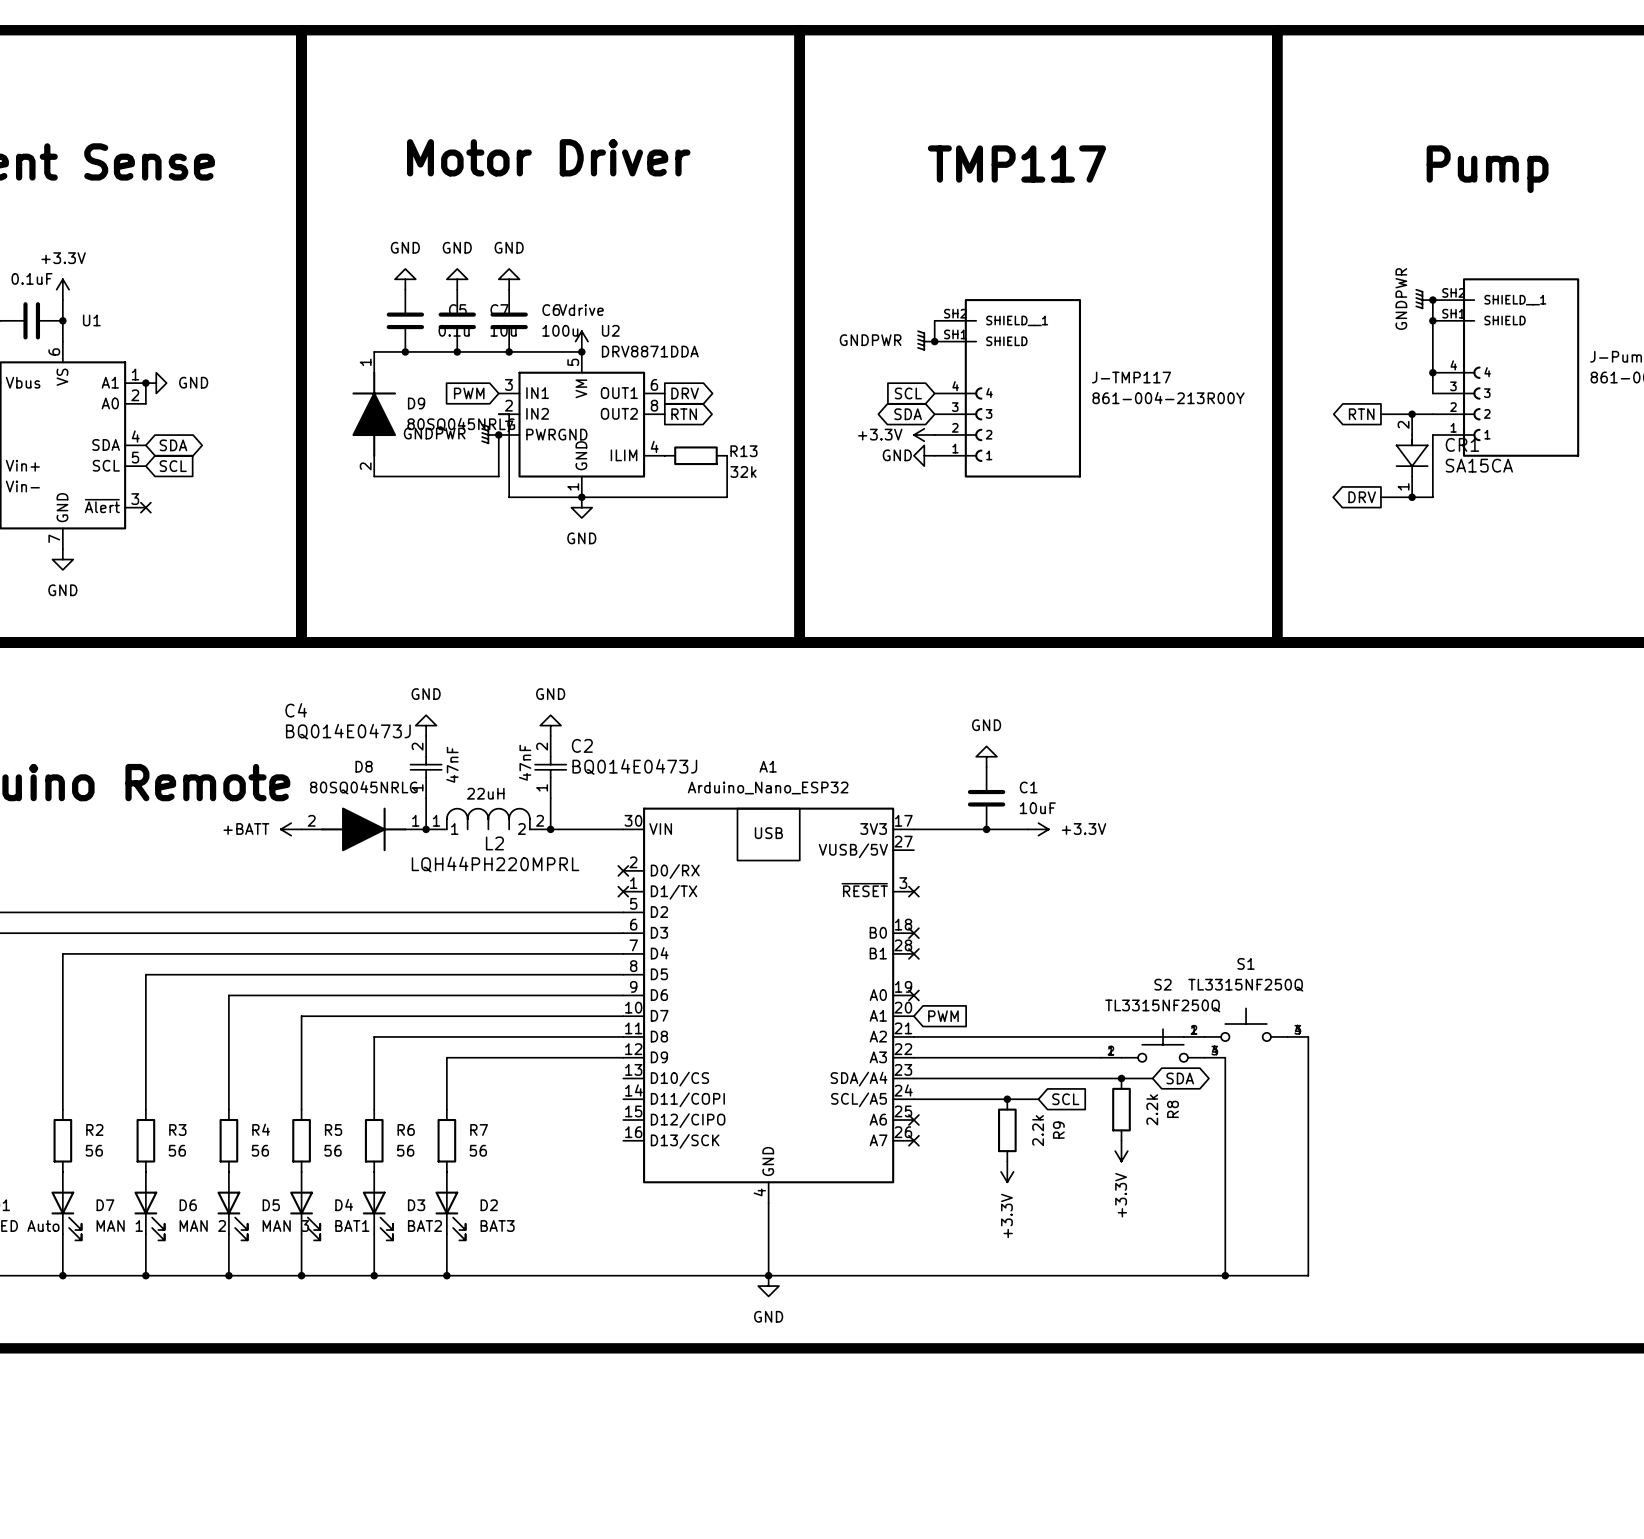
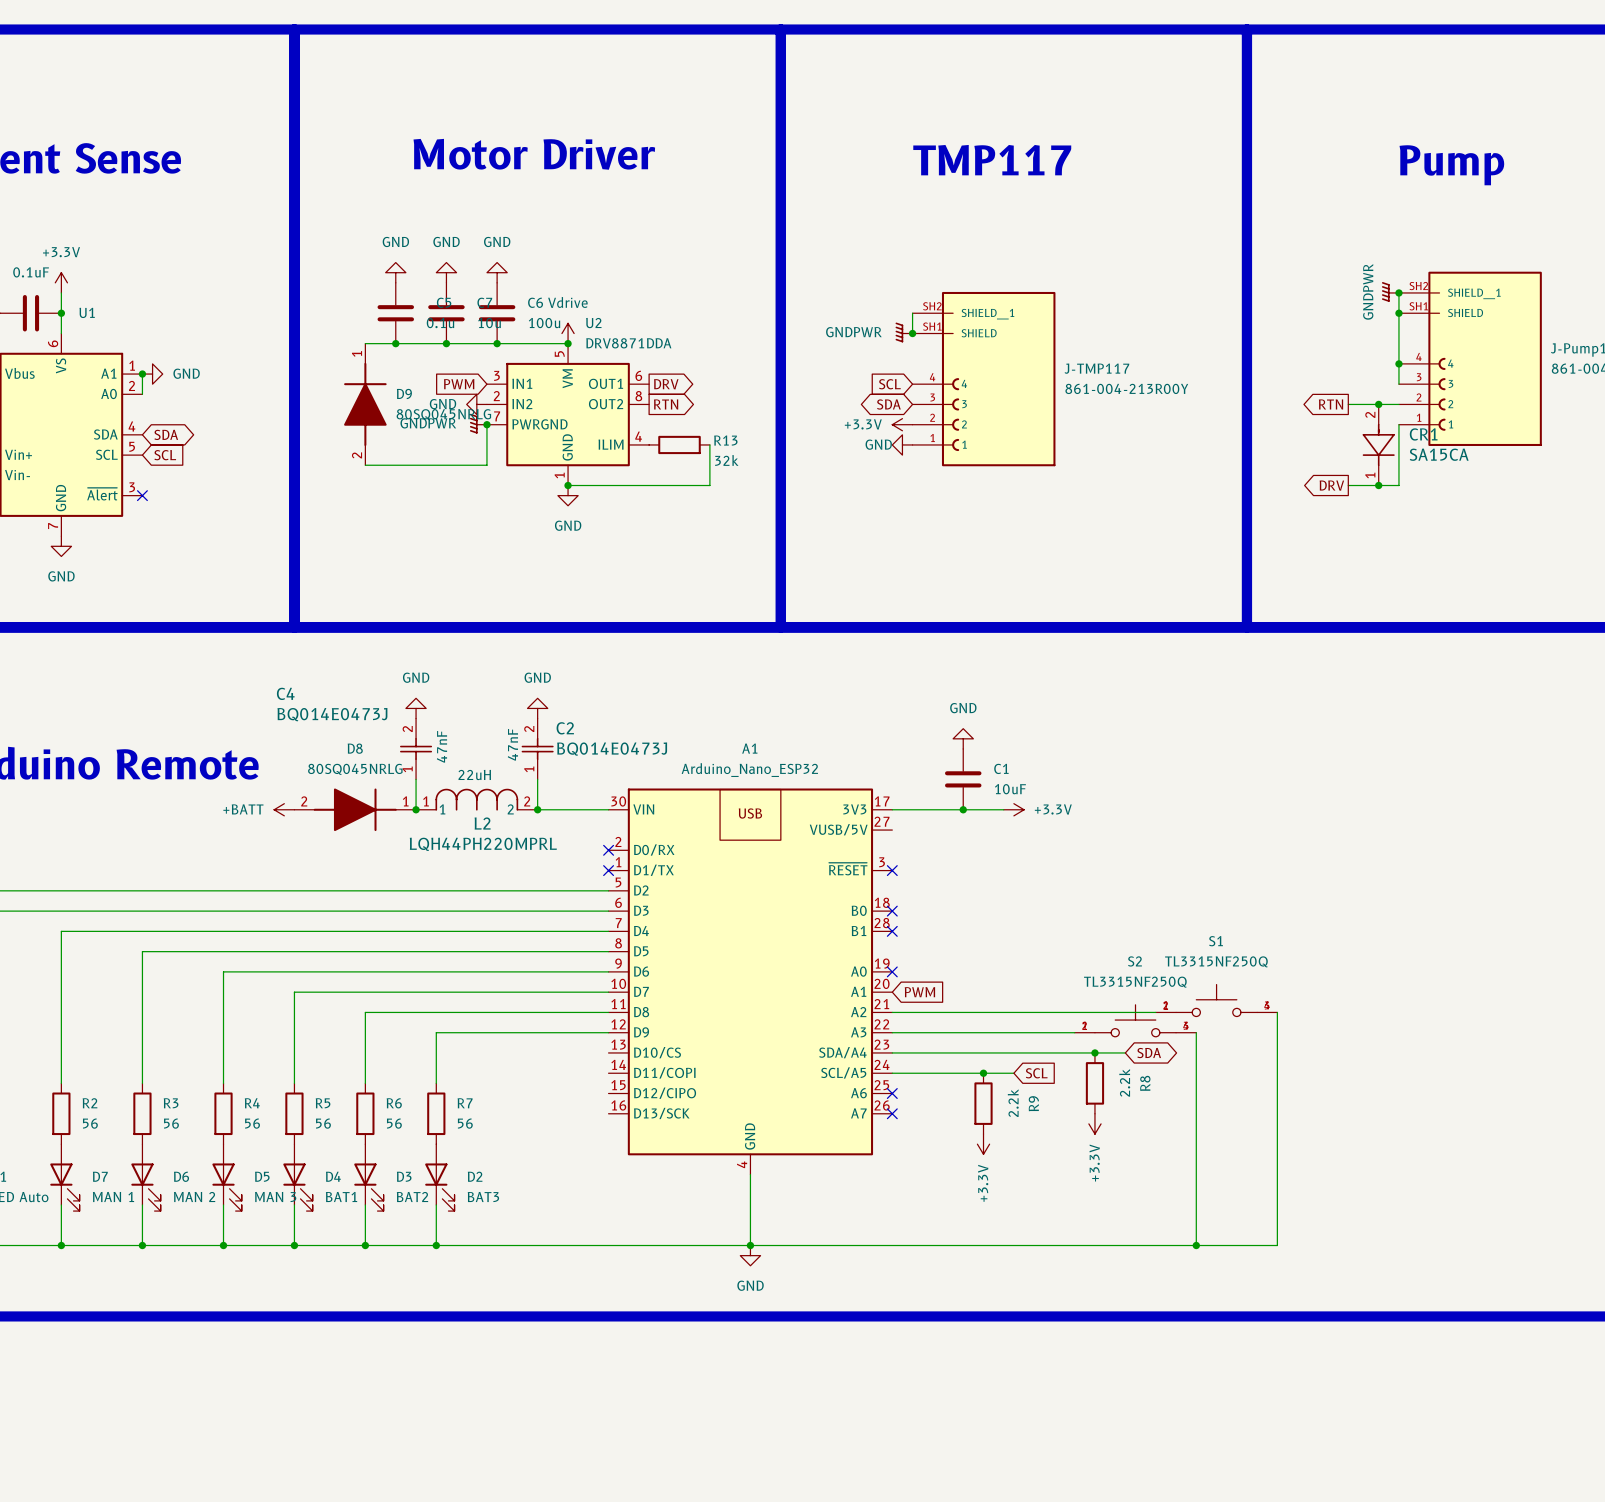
power symbol: none -> GND (476, 404)
wire: (498, 414) (509, 414) (509, 497) (581, 497) -> none

